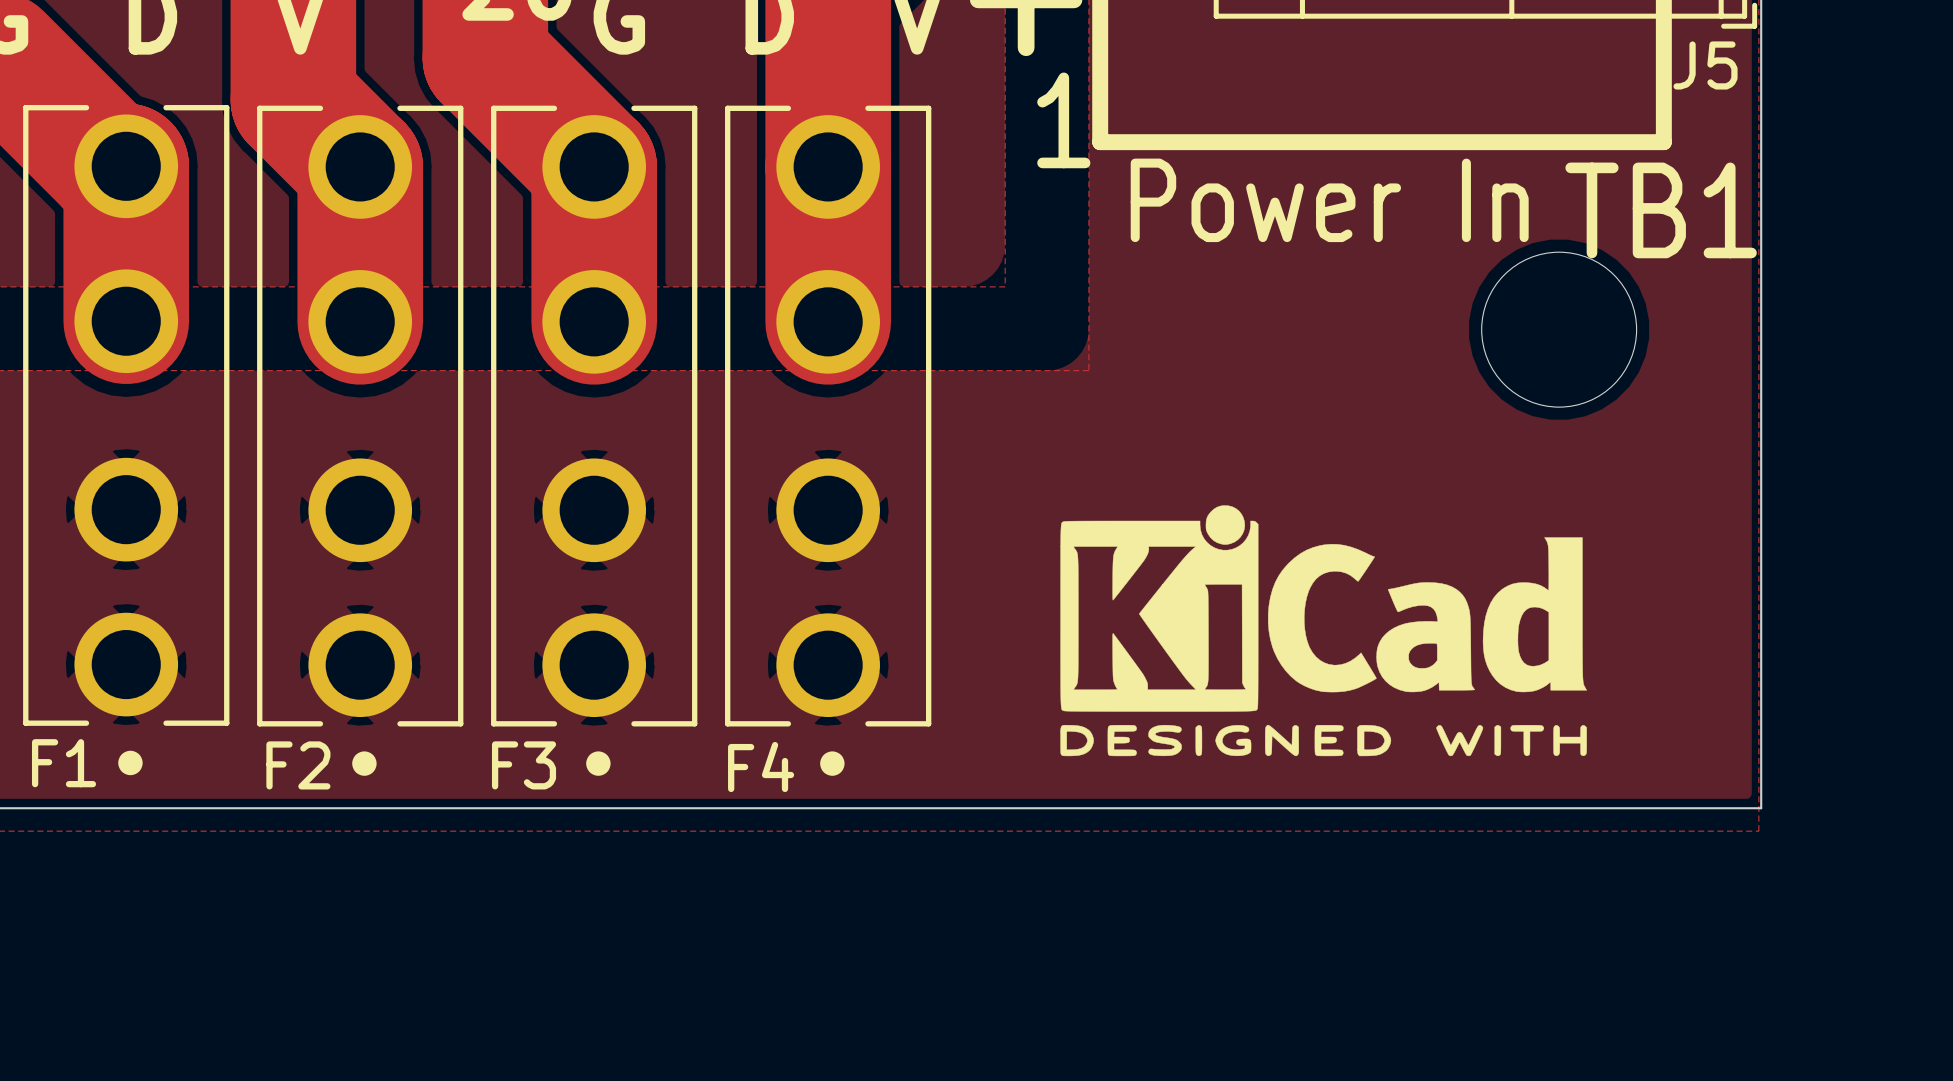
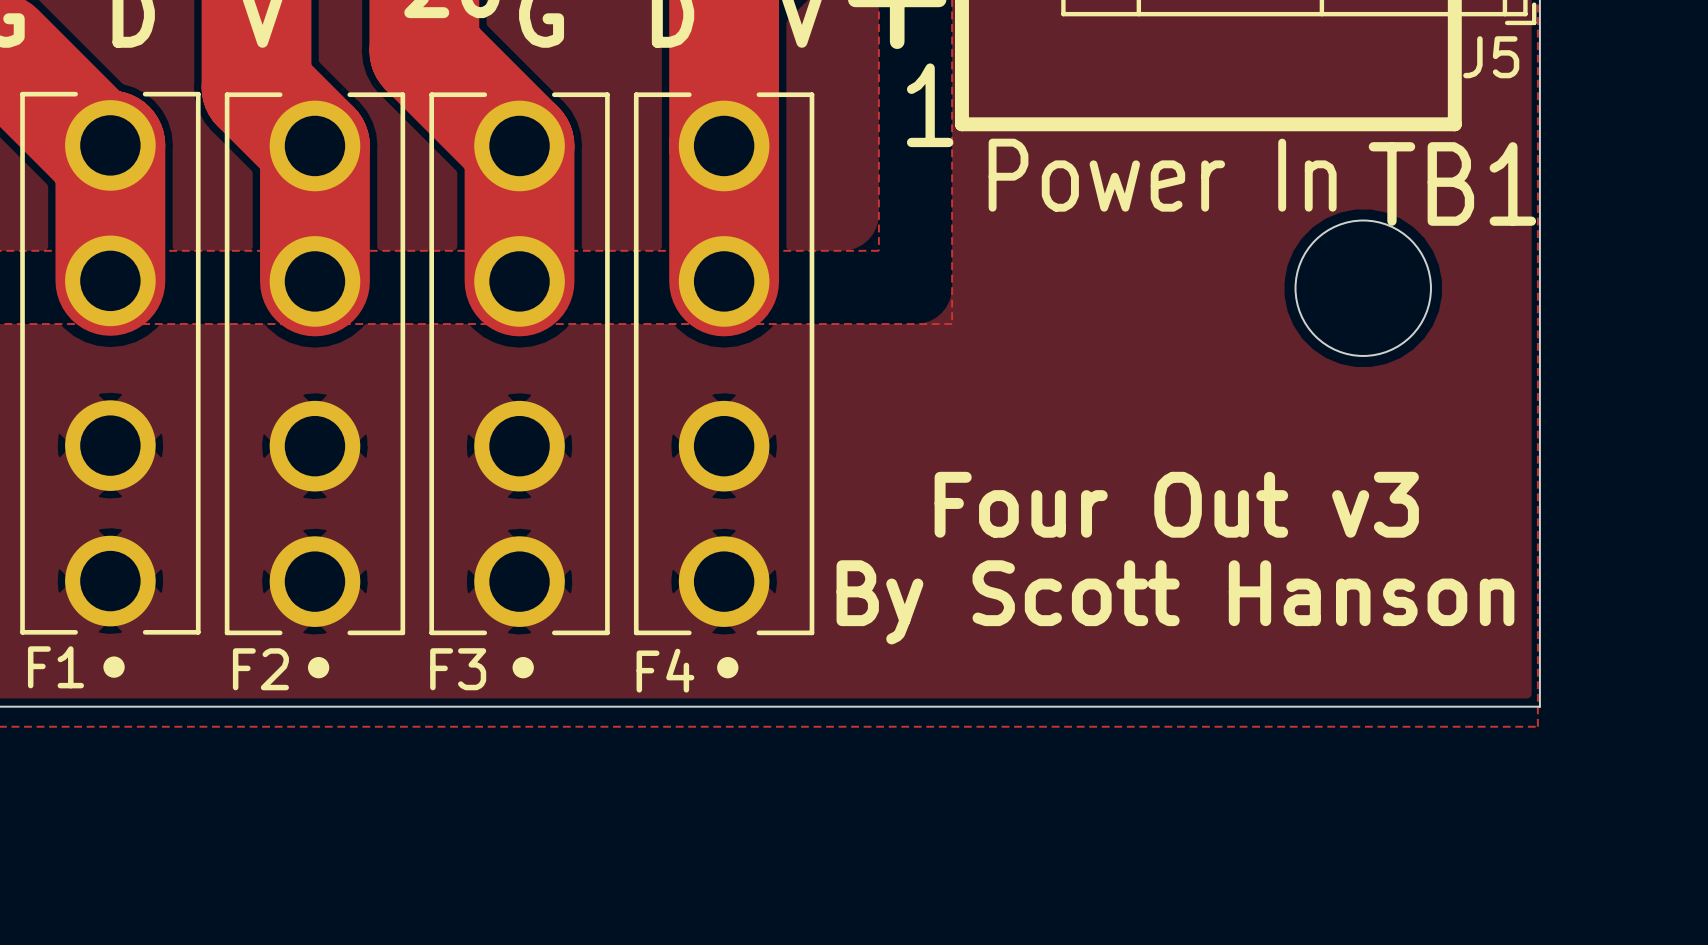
drawing: [1060, 505, 1587, 757] -> none
text: none -> Four Out v3 (1176, 504)
text: none -> By Scott Hanson (1175, 602)

